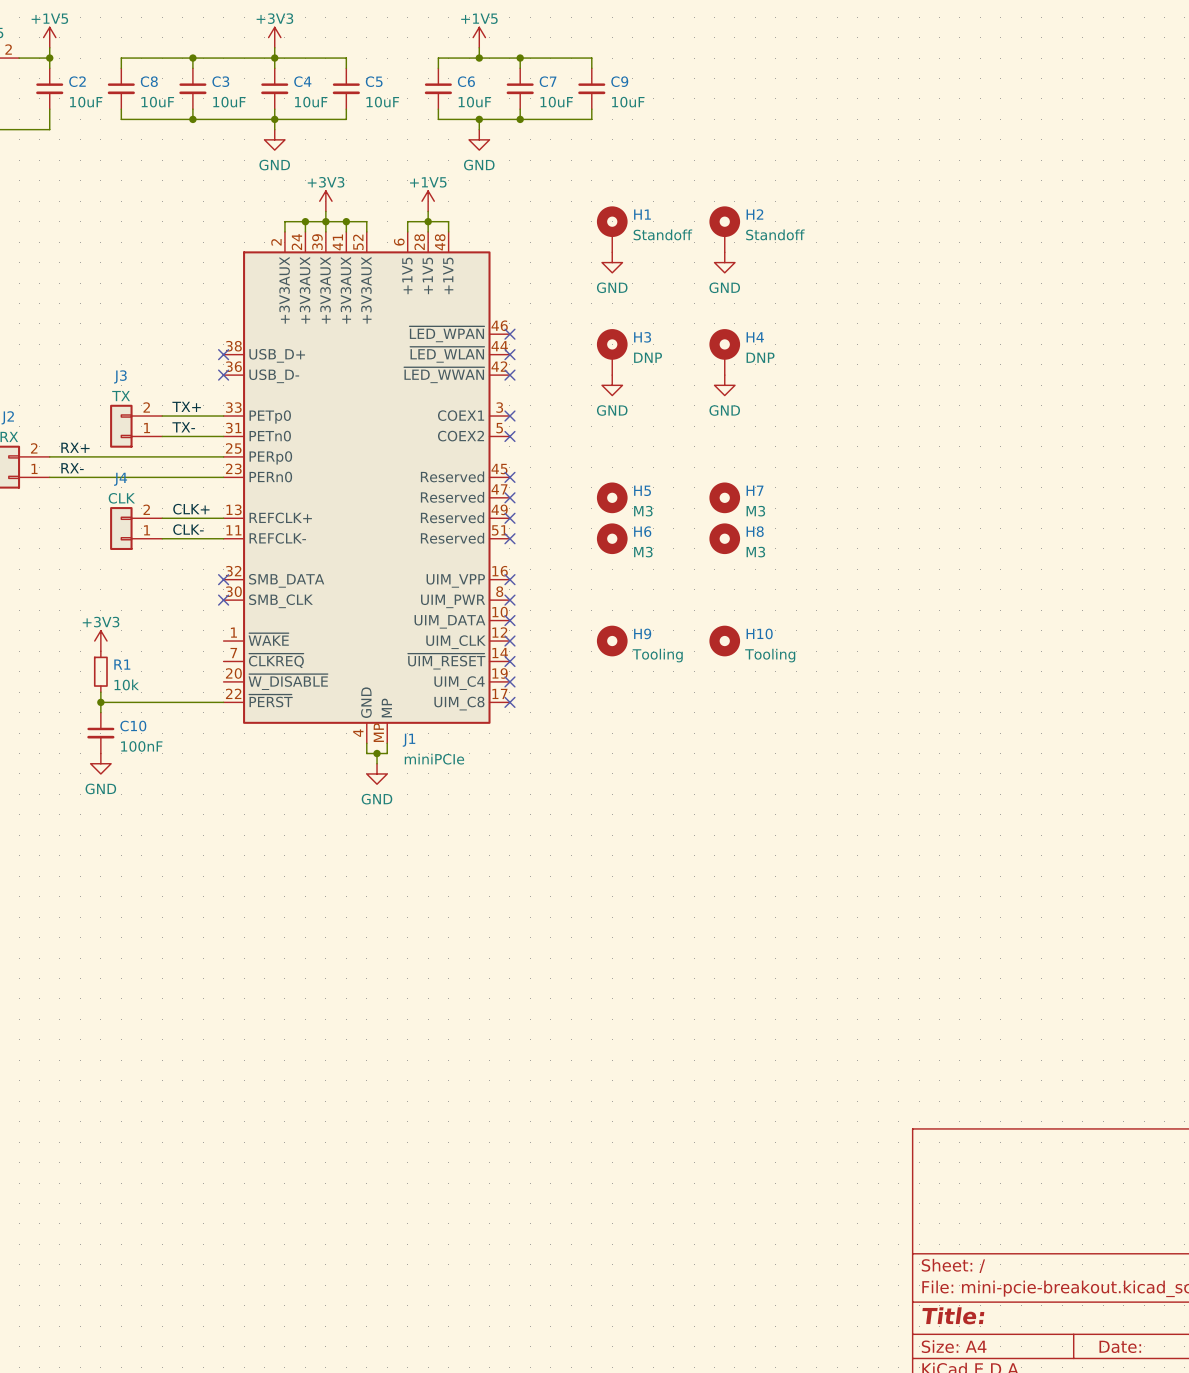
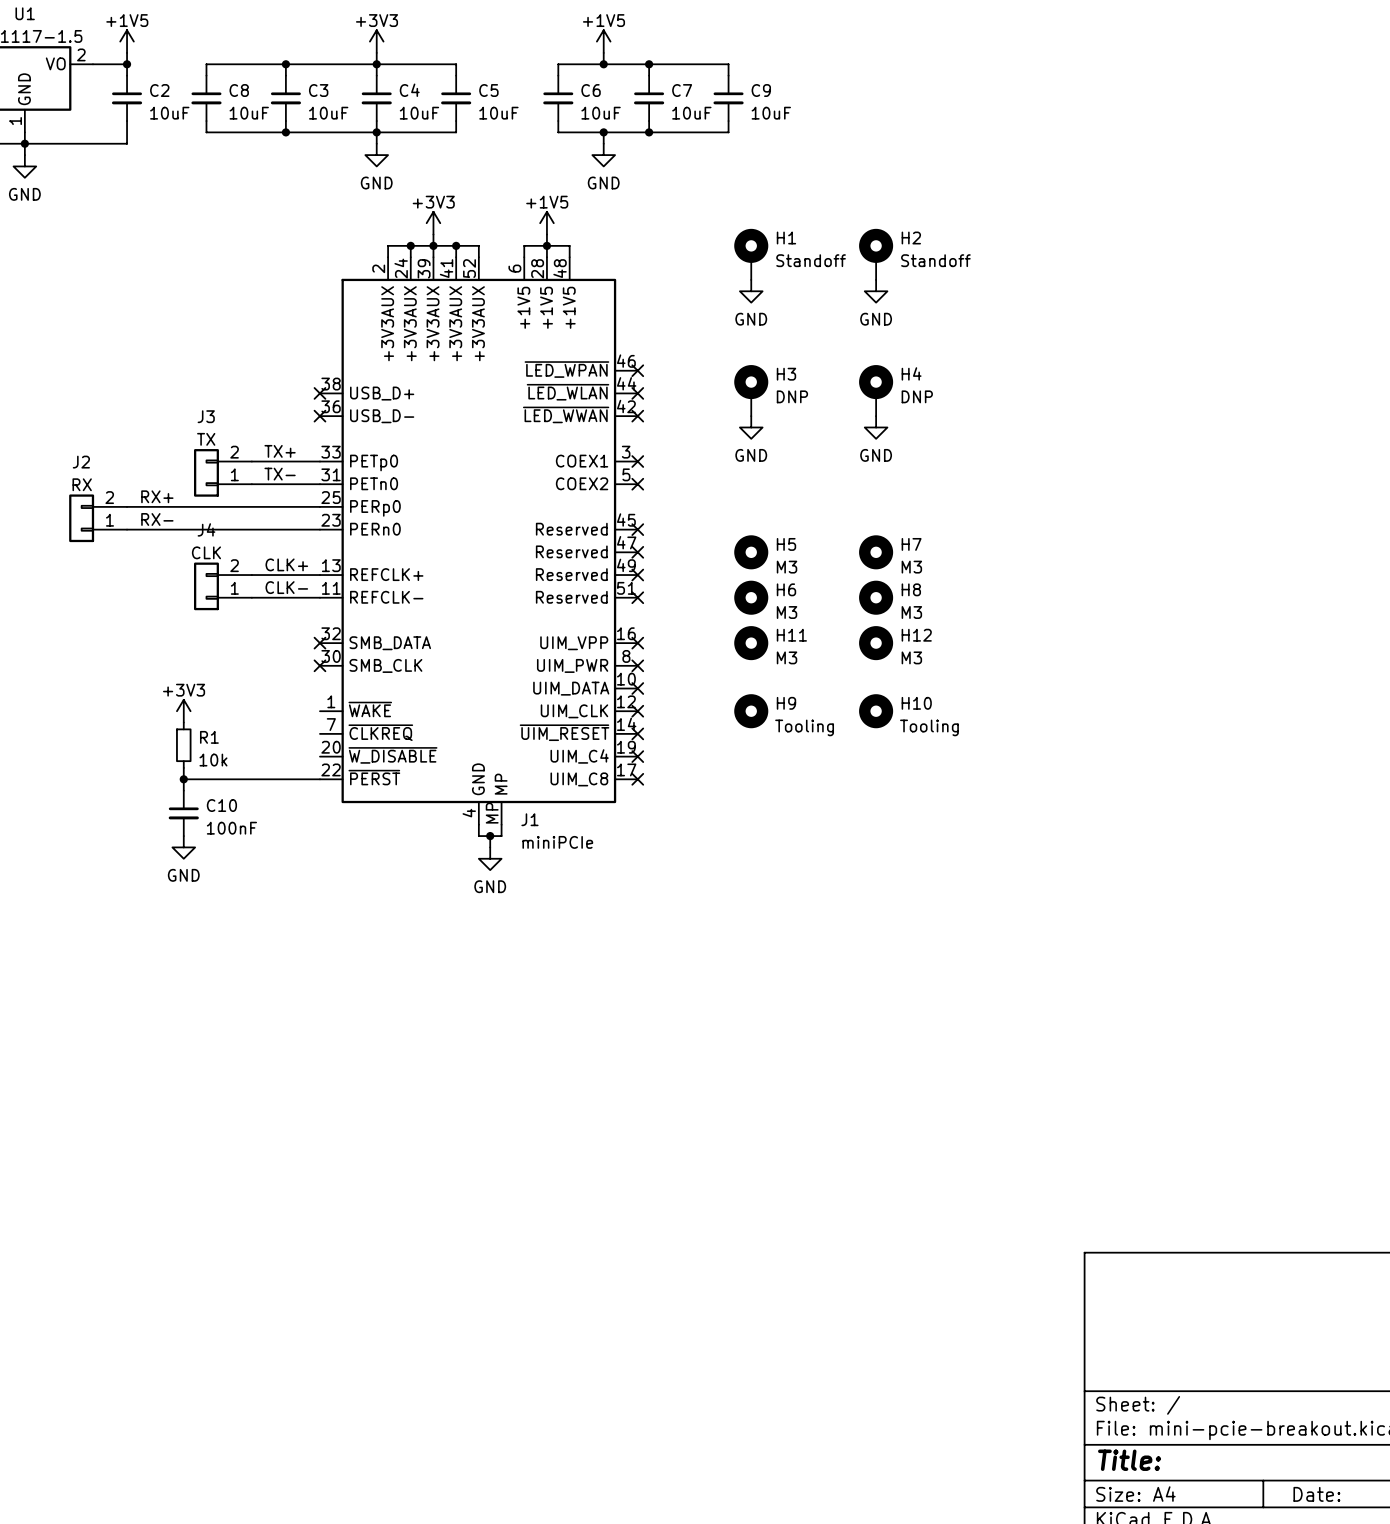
H11: none -> M3 (751, 643)
H12: none -> M3 (876, 643)

